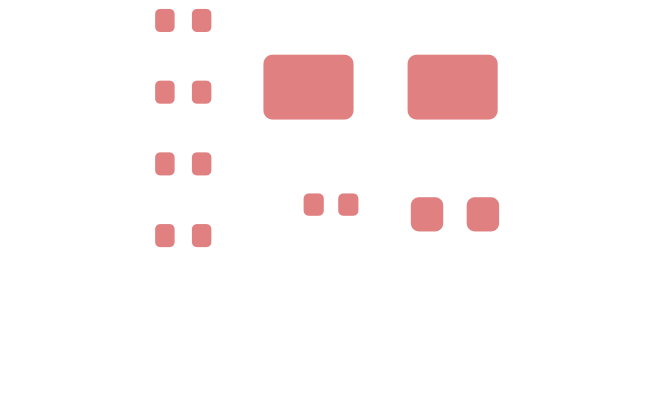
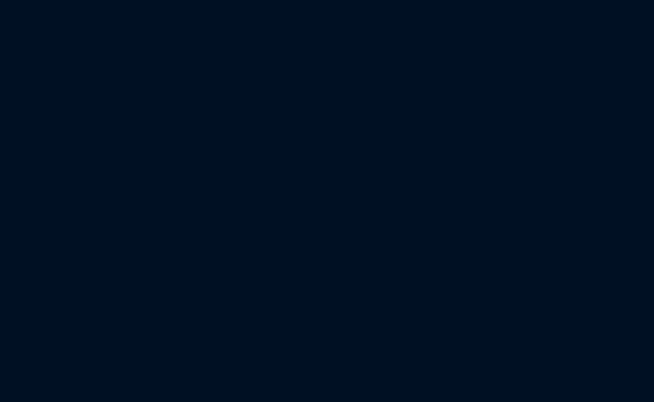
part: (183, 20) -> none
part: (380, 87) -> none
part: (183, 92) -> none
part: (183, 163) -> none
part: (331, 204) -> none
part: (454, 214) -> none
part: (183, 235) -> none

